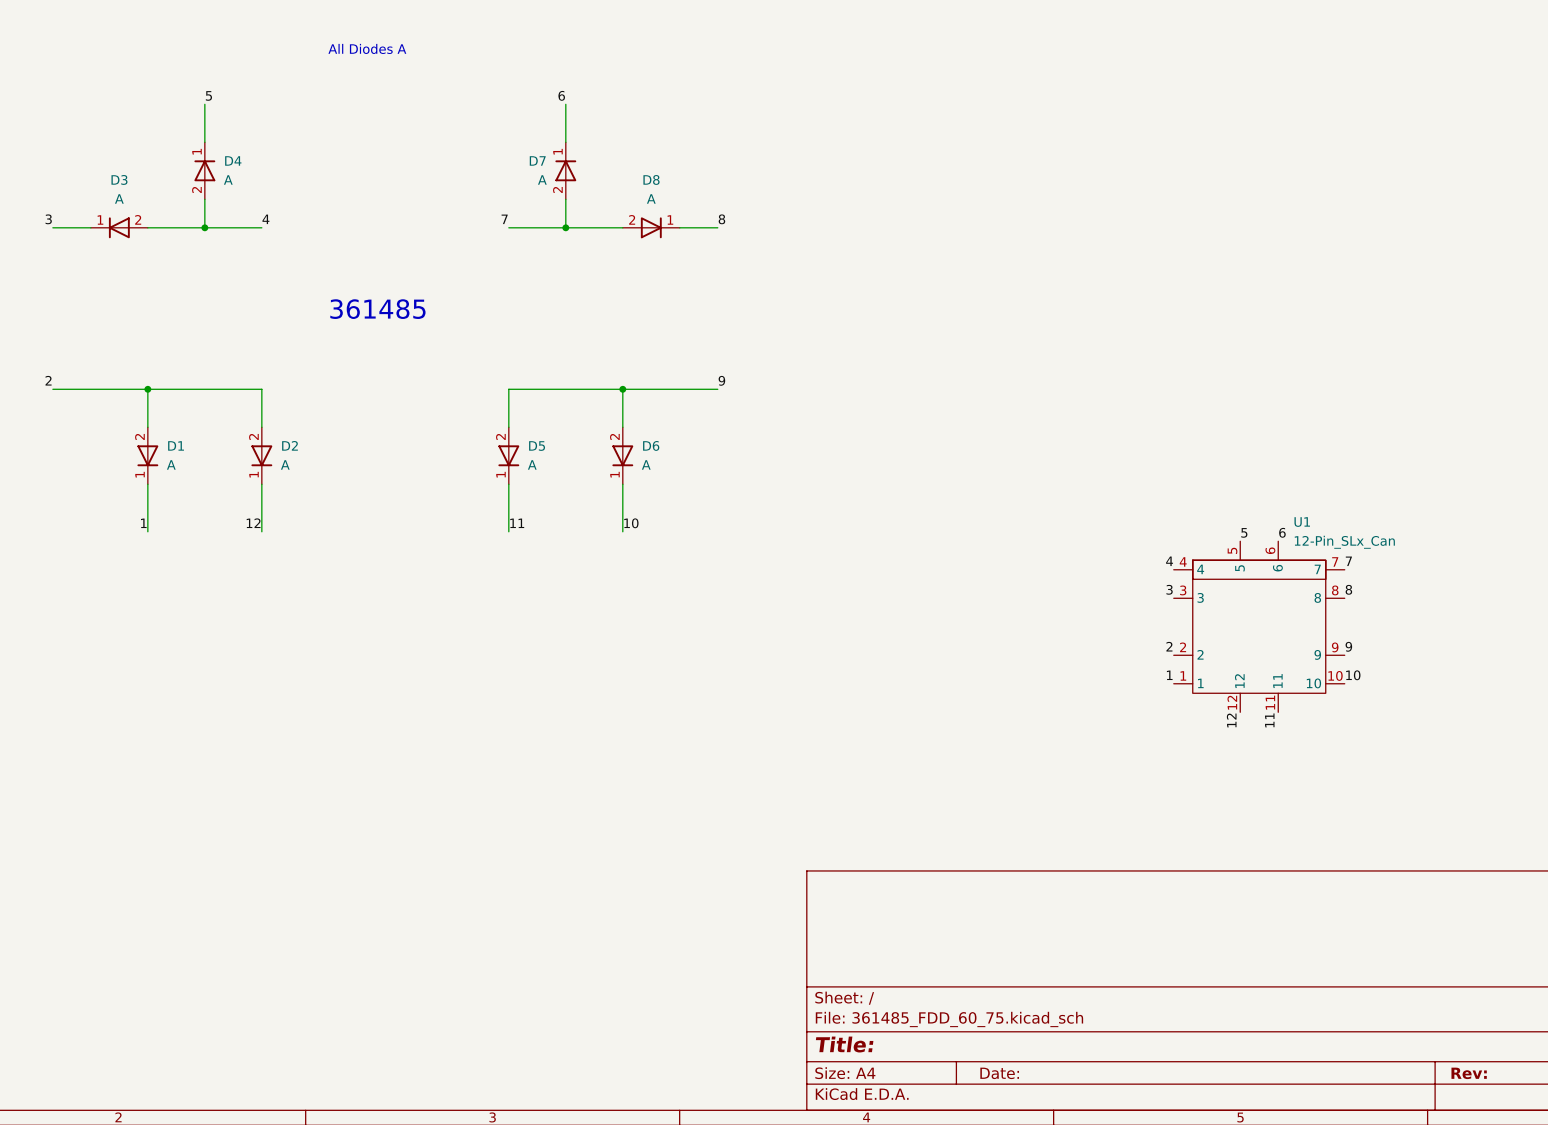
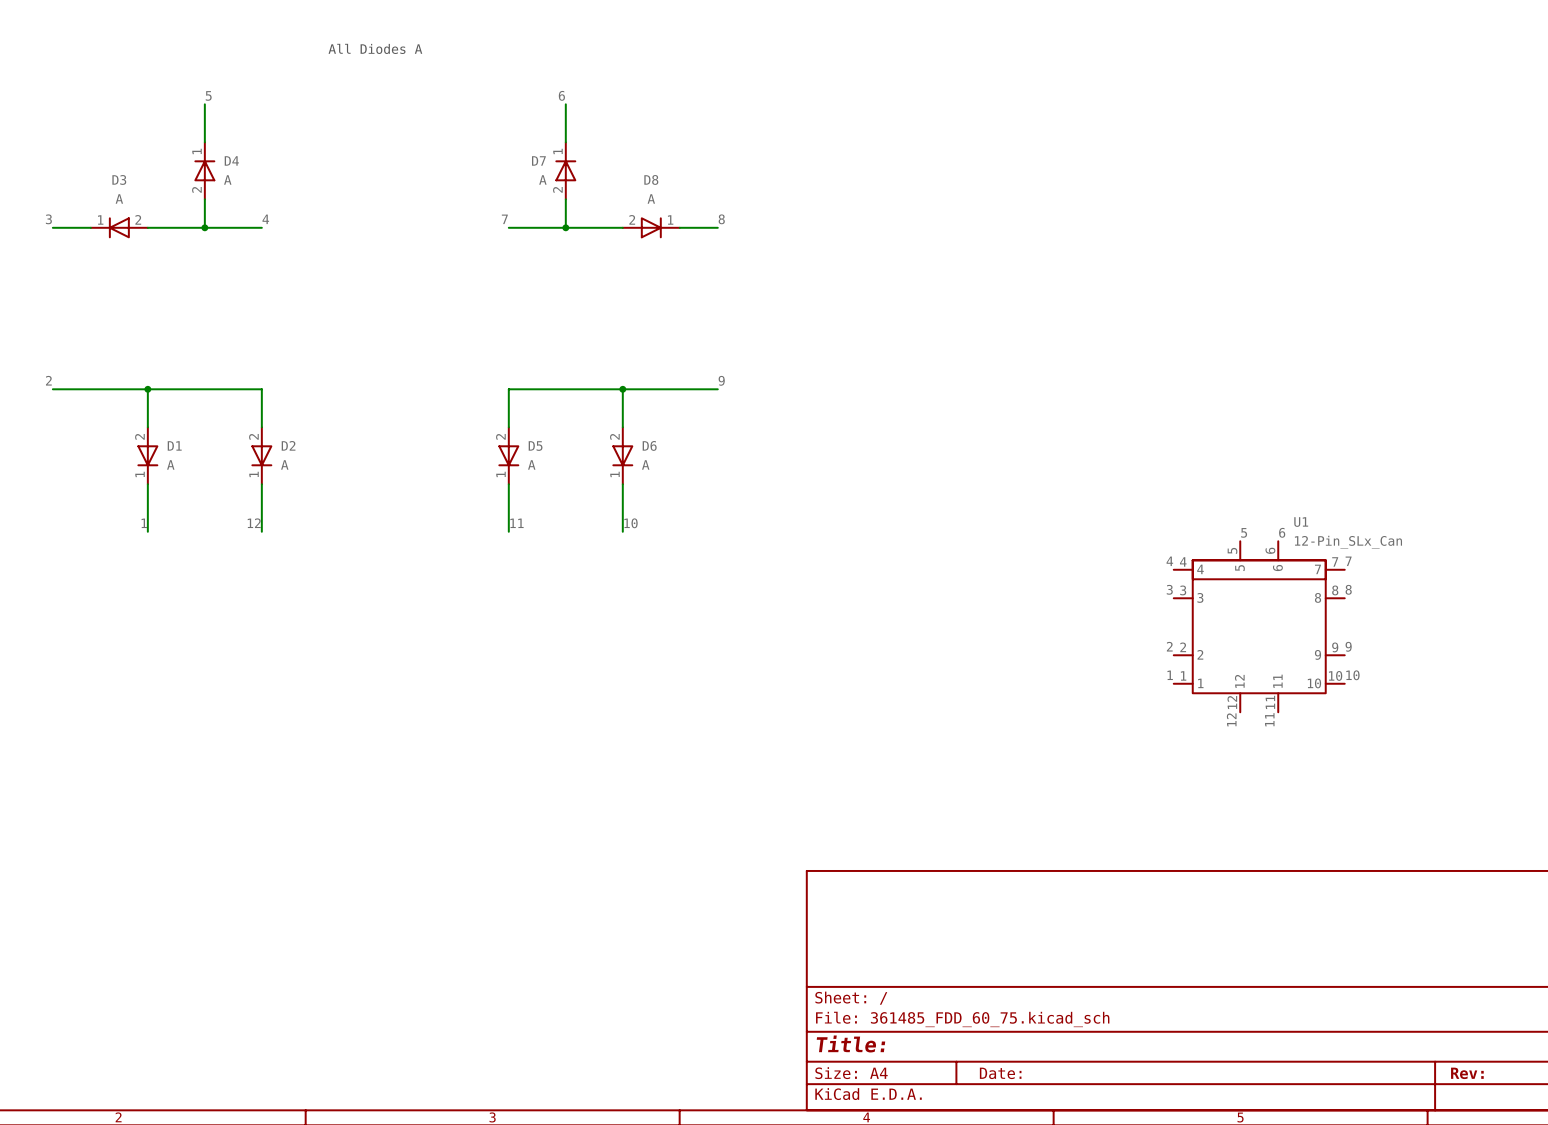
text: 361485 (377, 309) -> none

